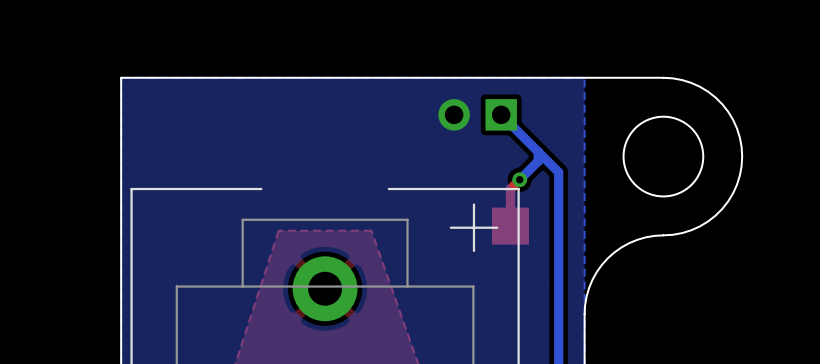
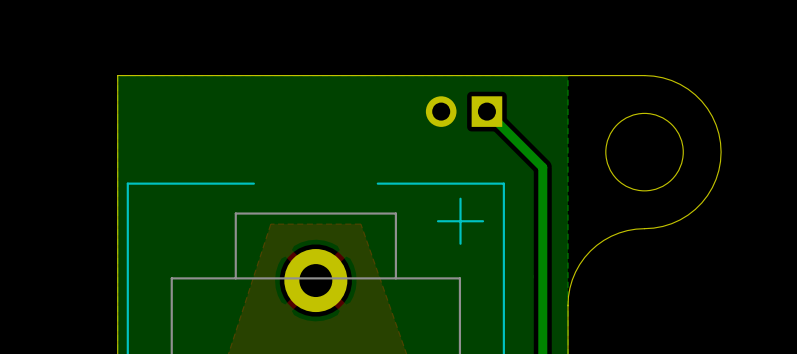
bottom track: (538, 151) (538, 161) (519, 179) -> none
top track: (519, 179) (510, 189) (510, 226) -> none
via: (519, 179) -> none
part: (510, 226) -> none

